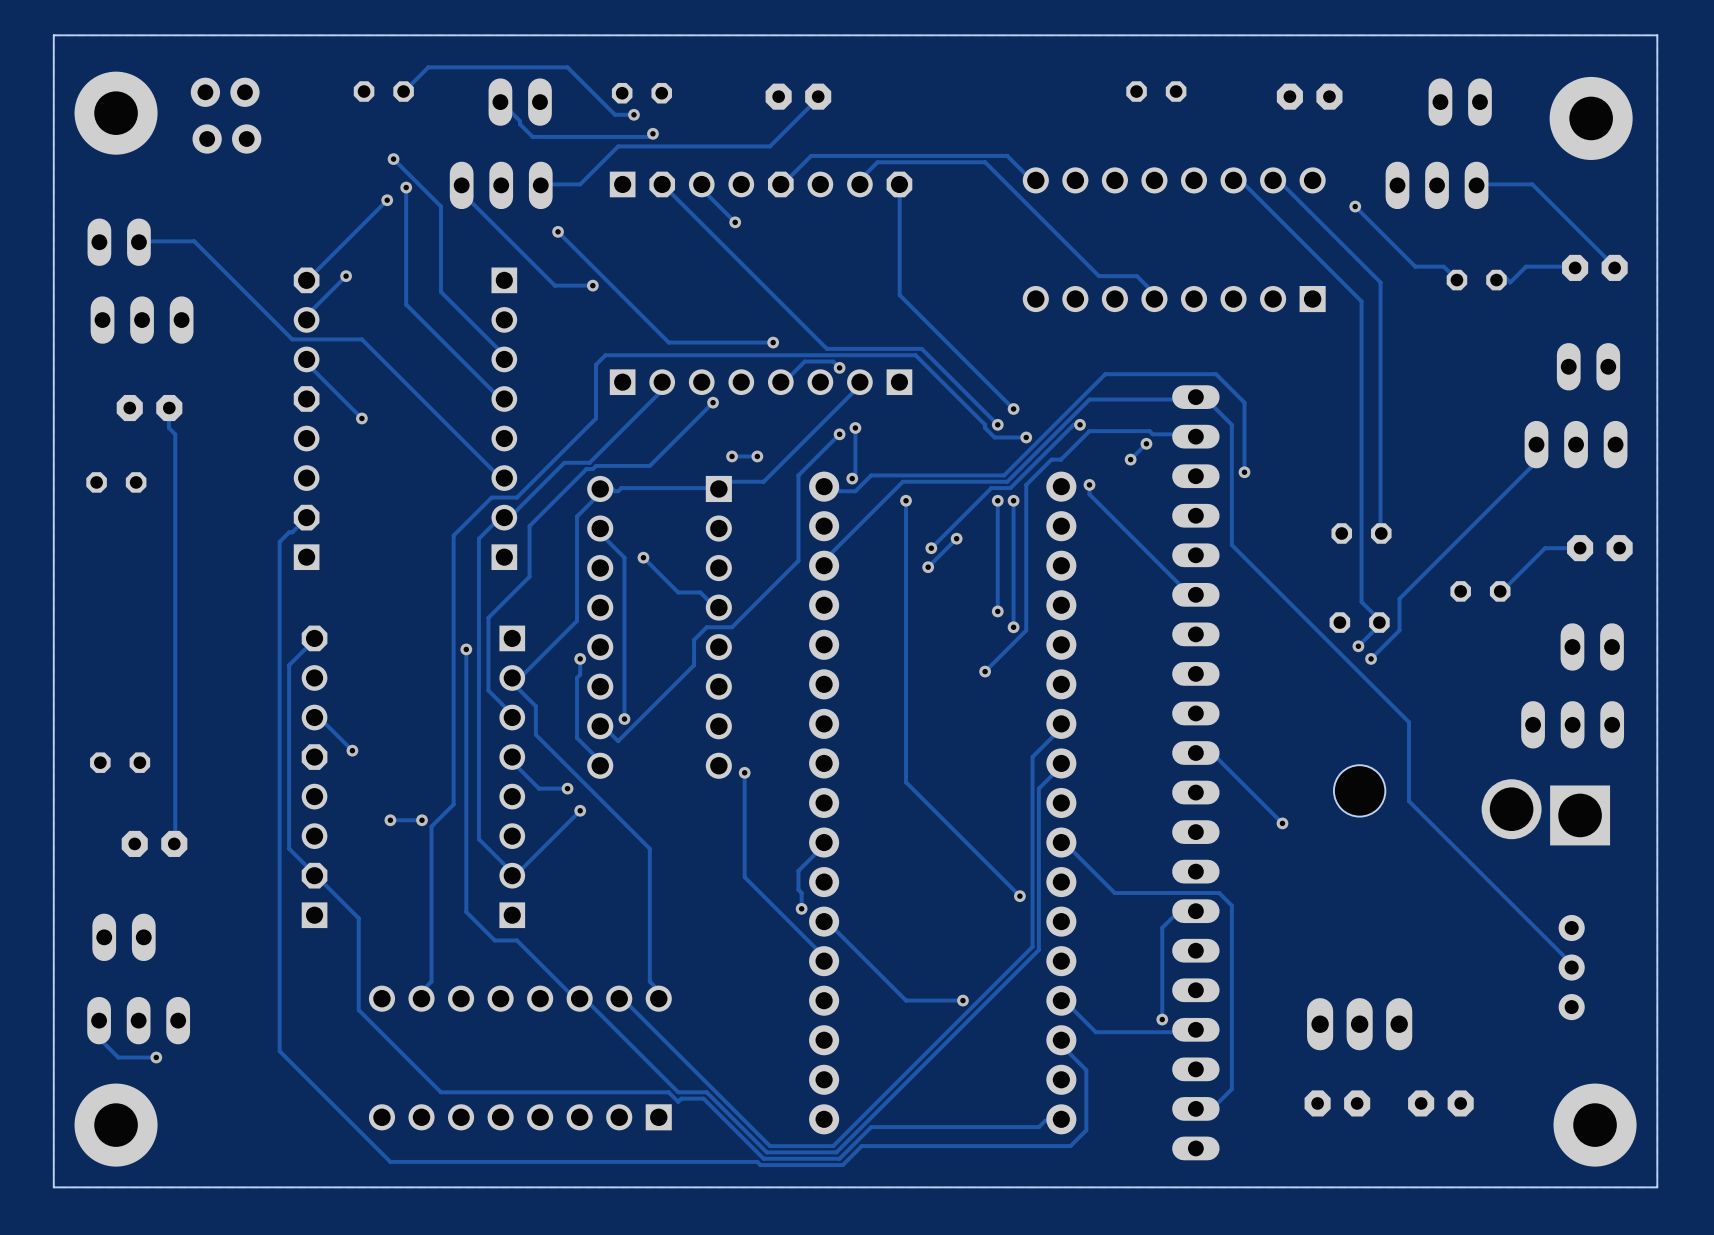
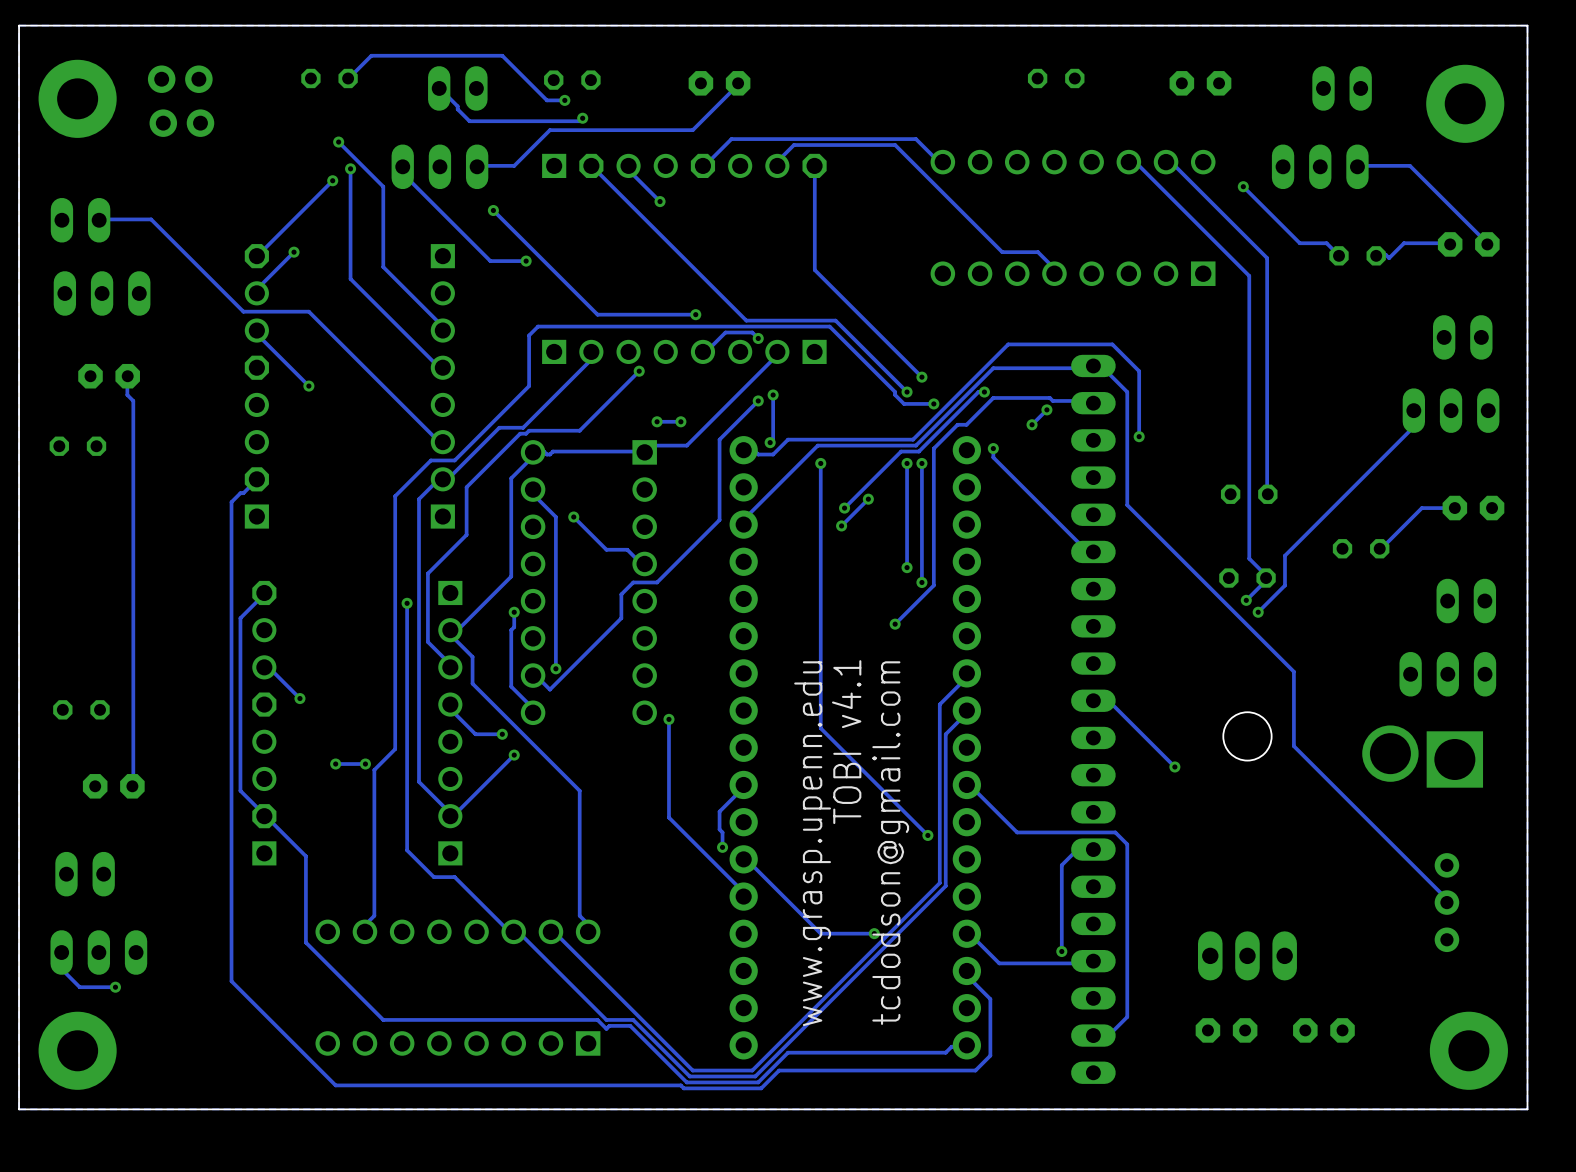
text: none -> TOBI v4.1 (846, 742)
text: none -> tcdodson@gmail.com (890, 843)
text: none -> www.grasp.upenn.edu (812, 843)

